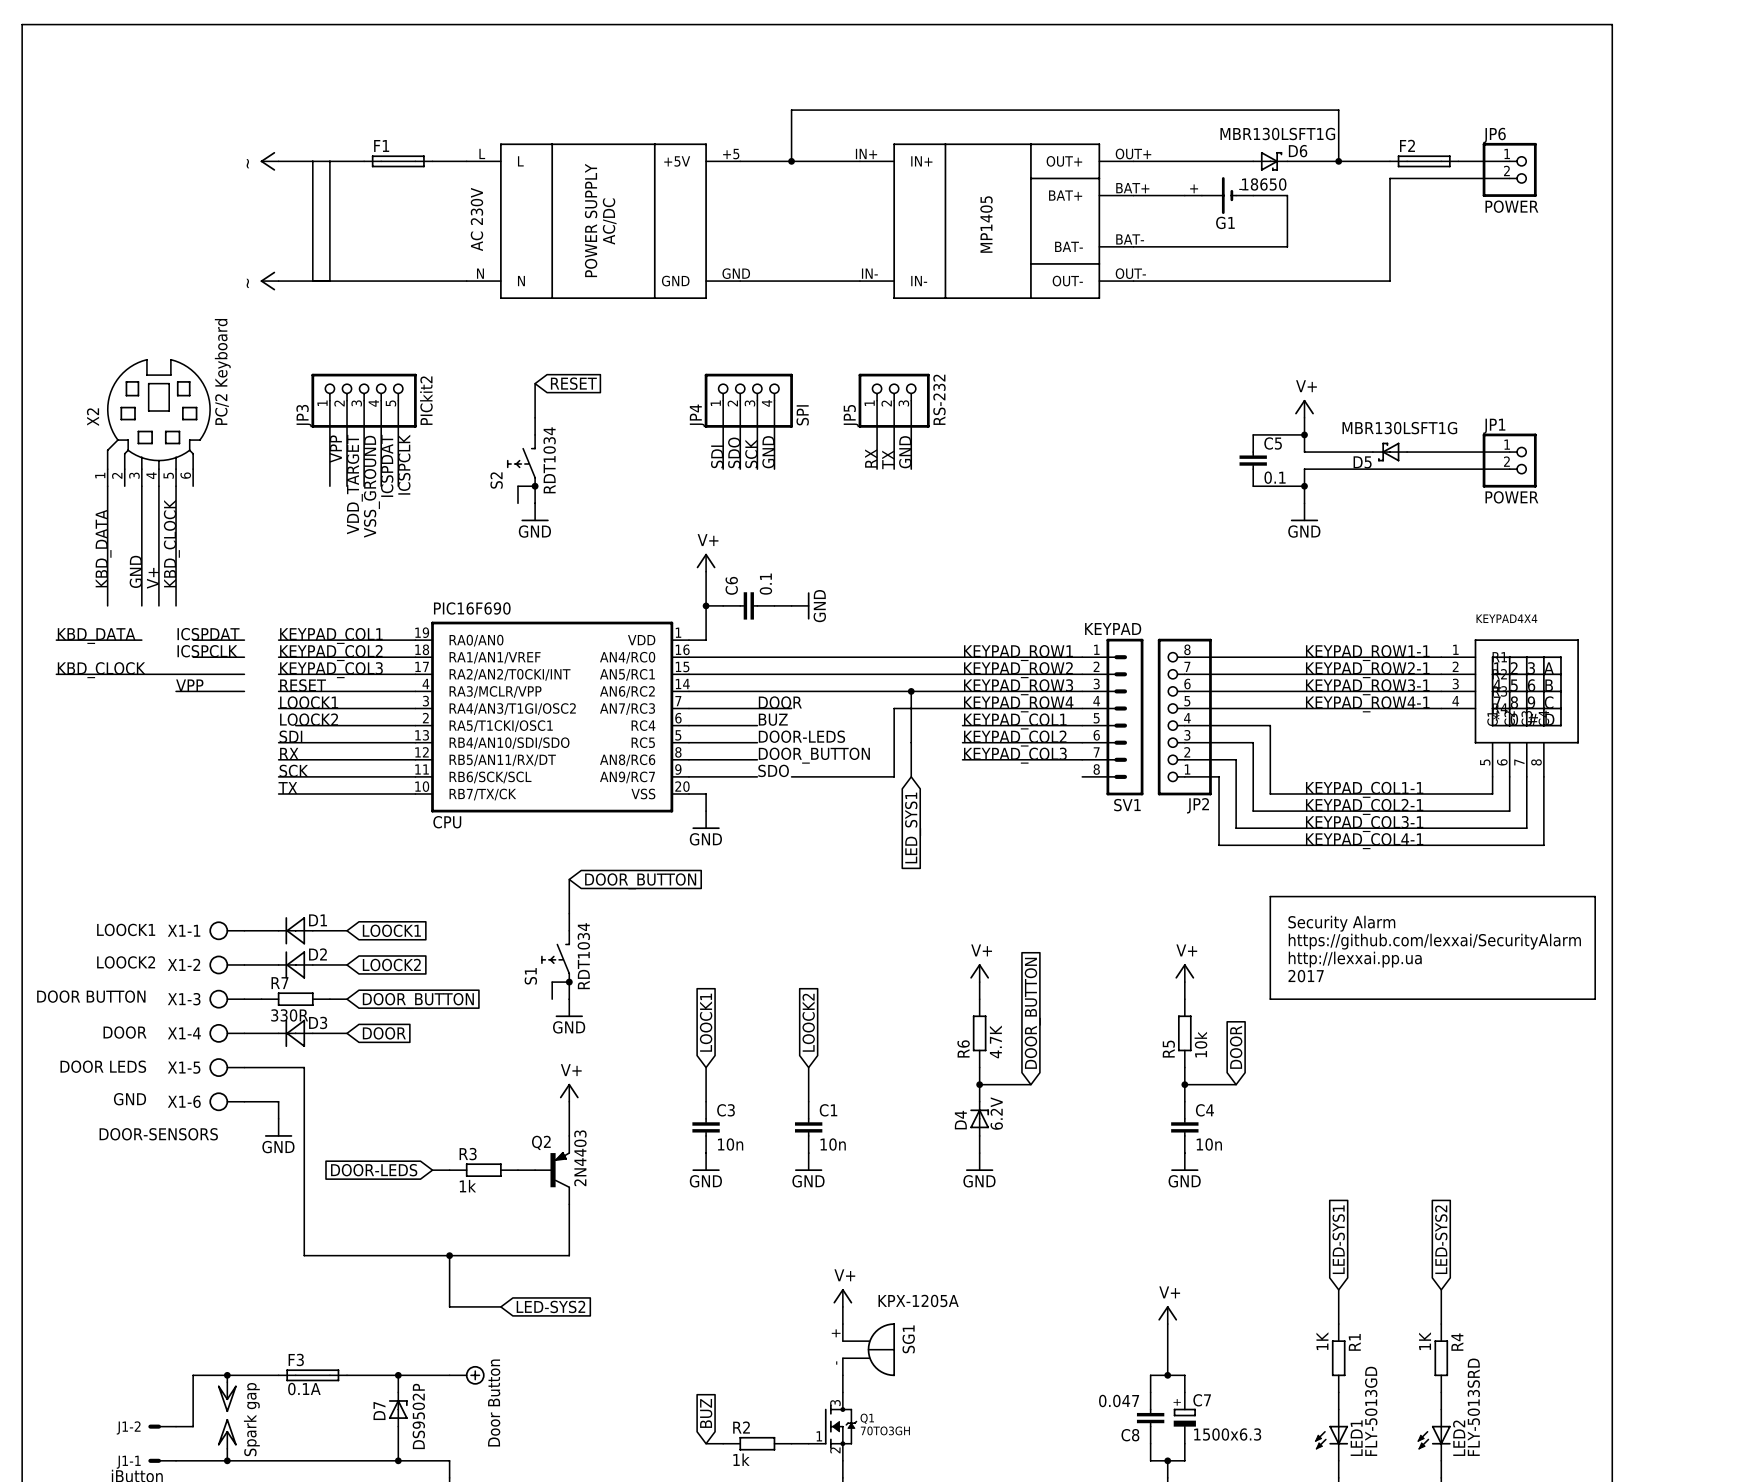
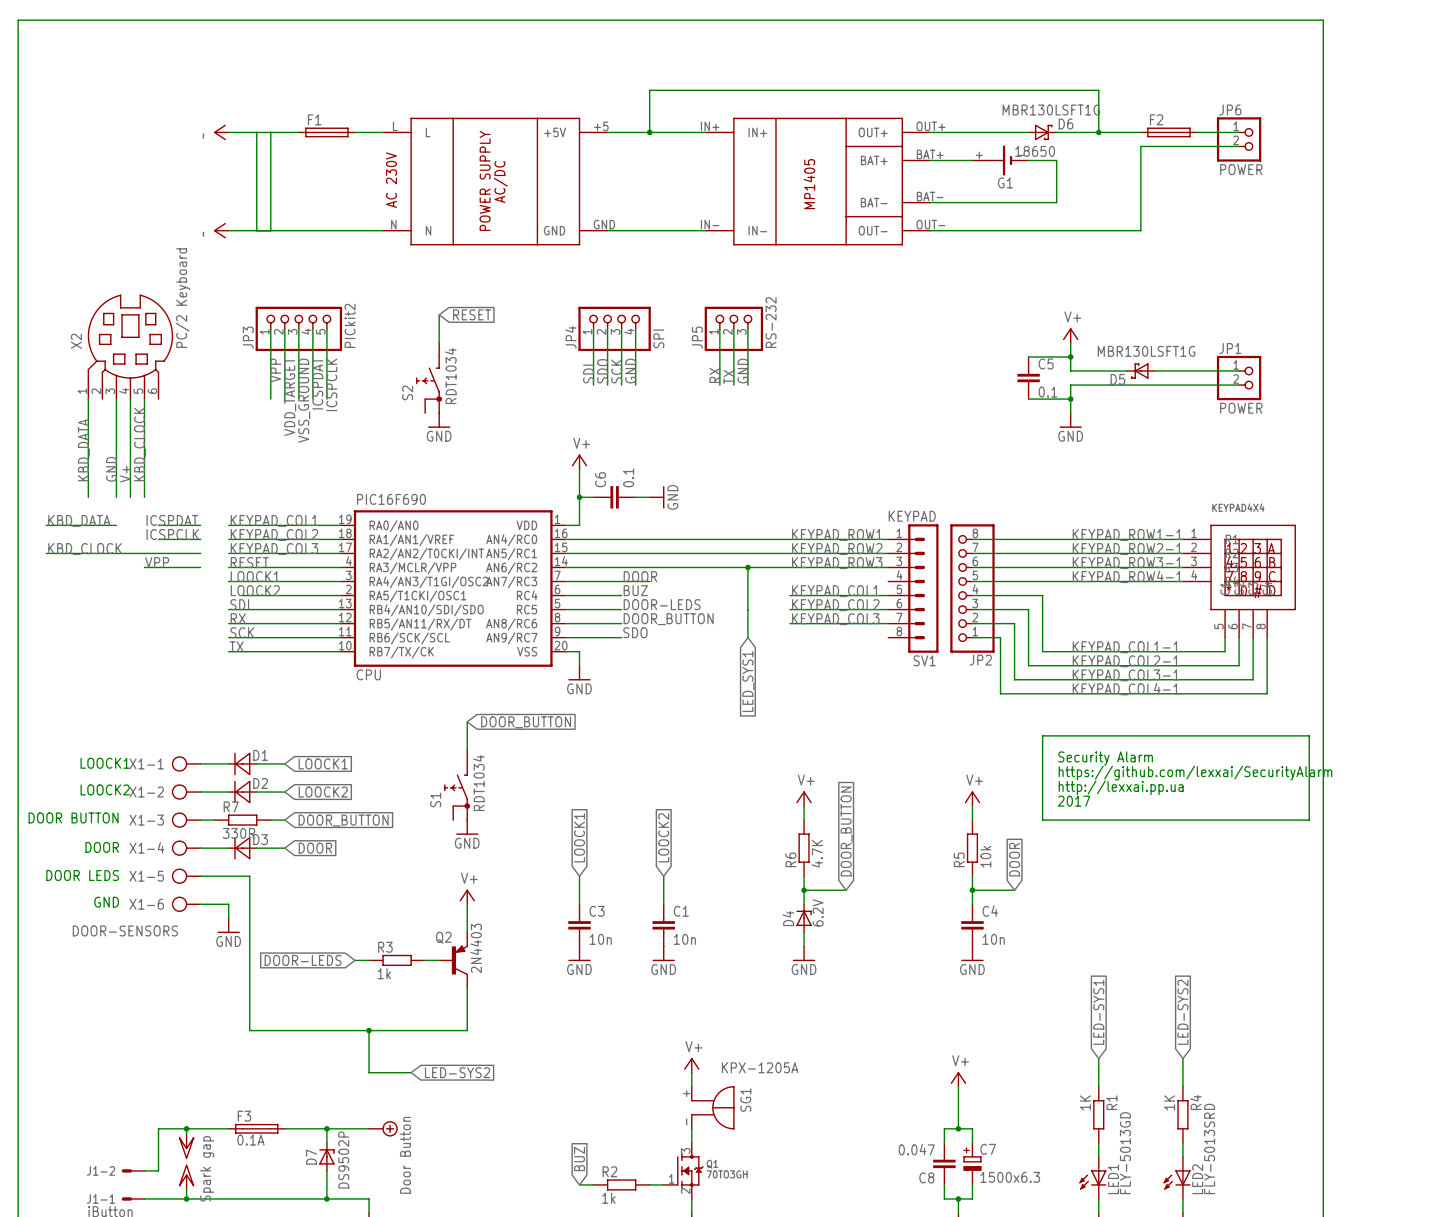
label: KEYPAD_ROW4 (1018, 704) -> none
wire: (1082, 708) (894, 708) (894, 776) (791, 776) -> none

